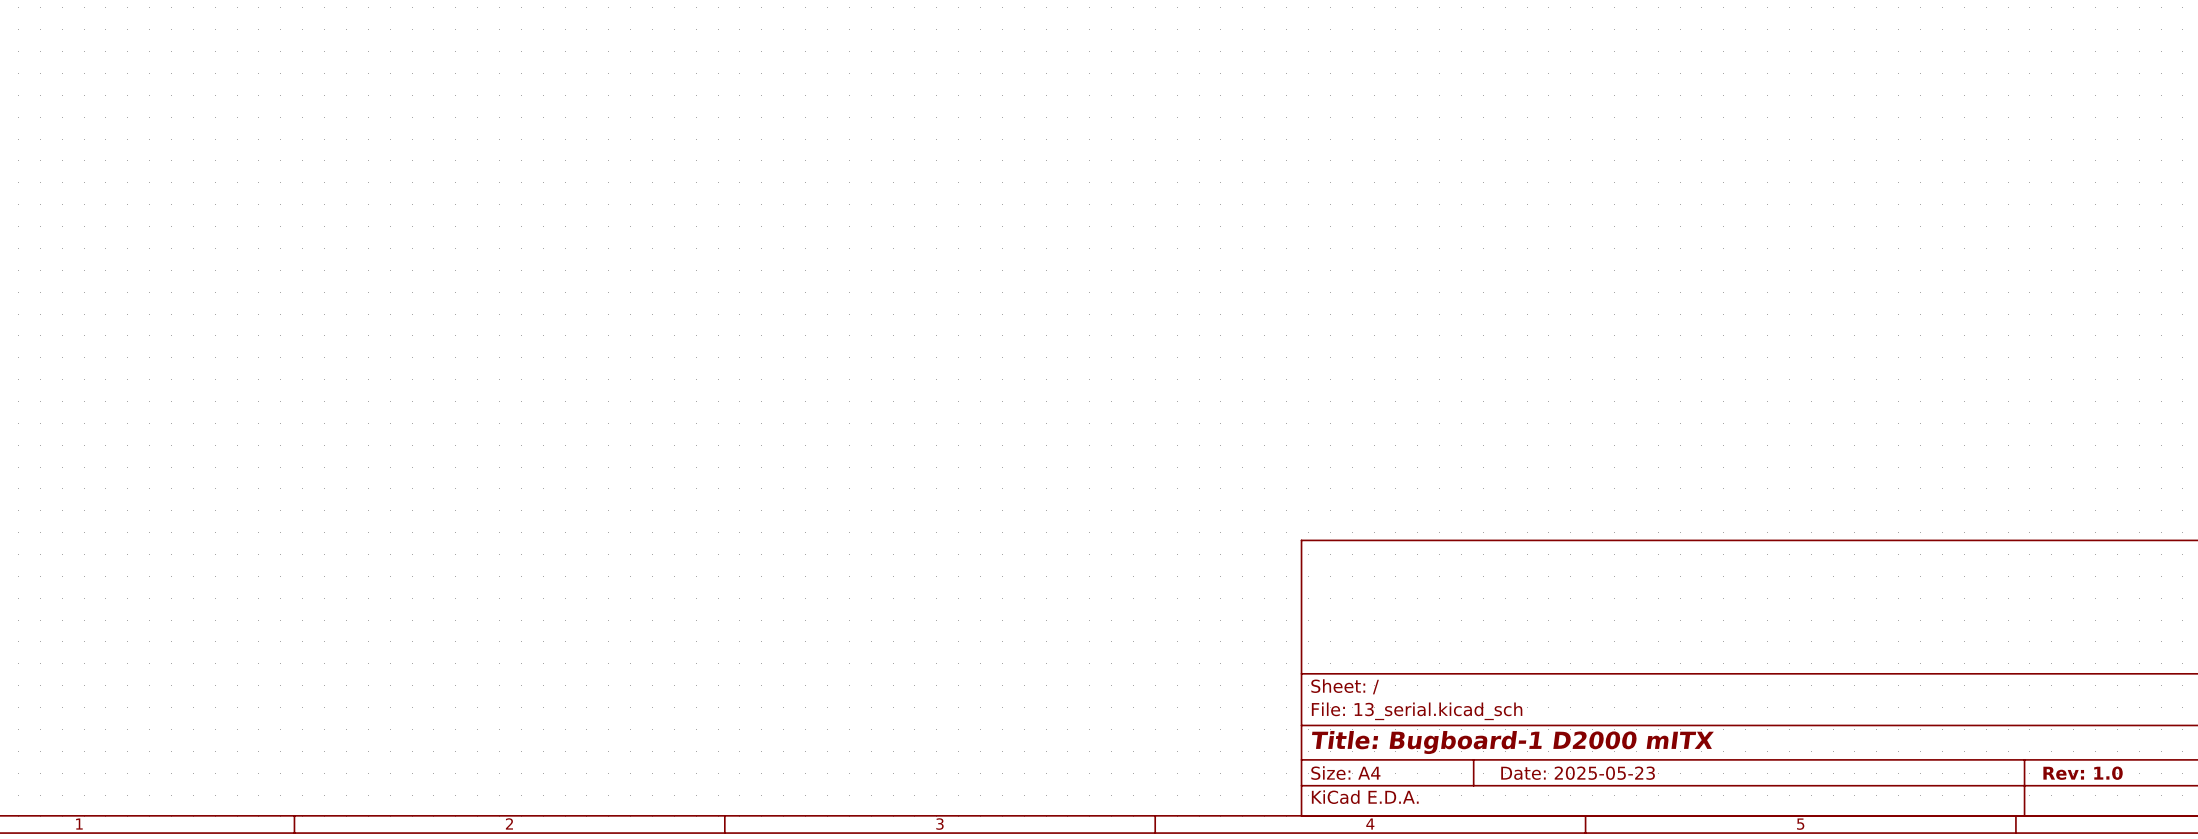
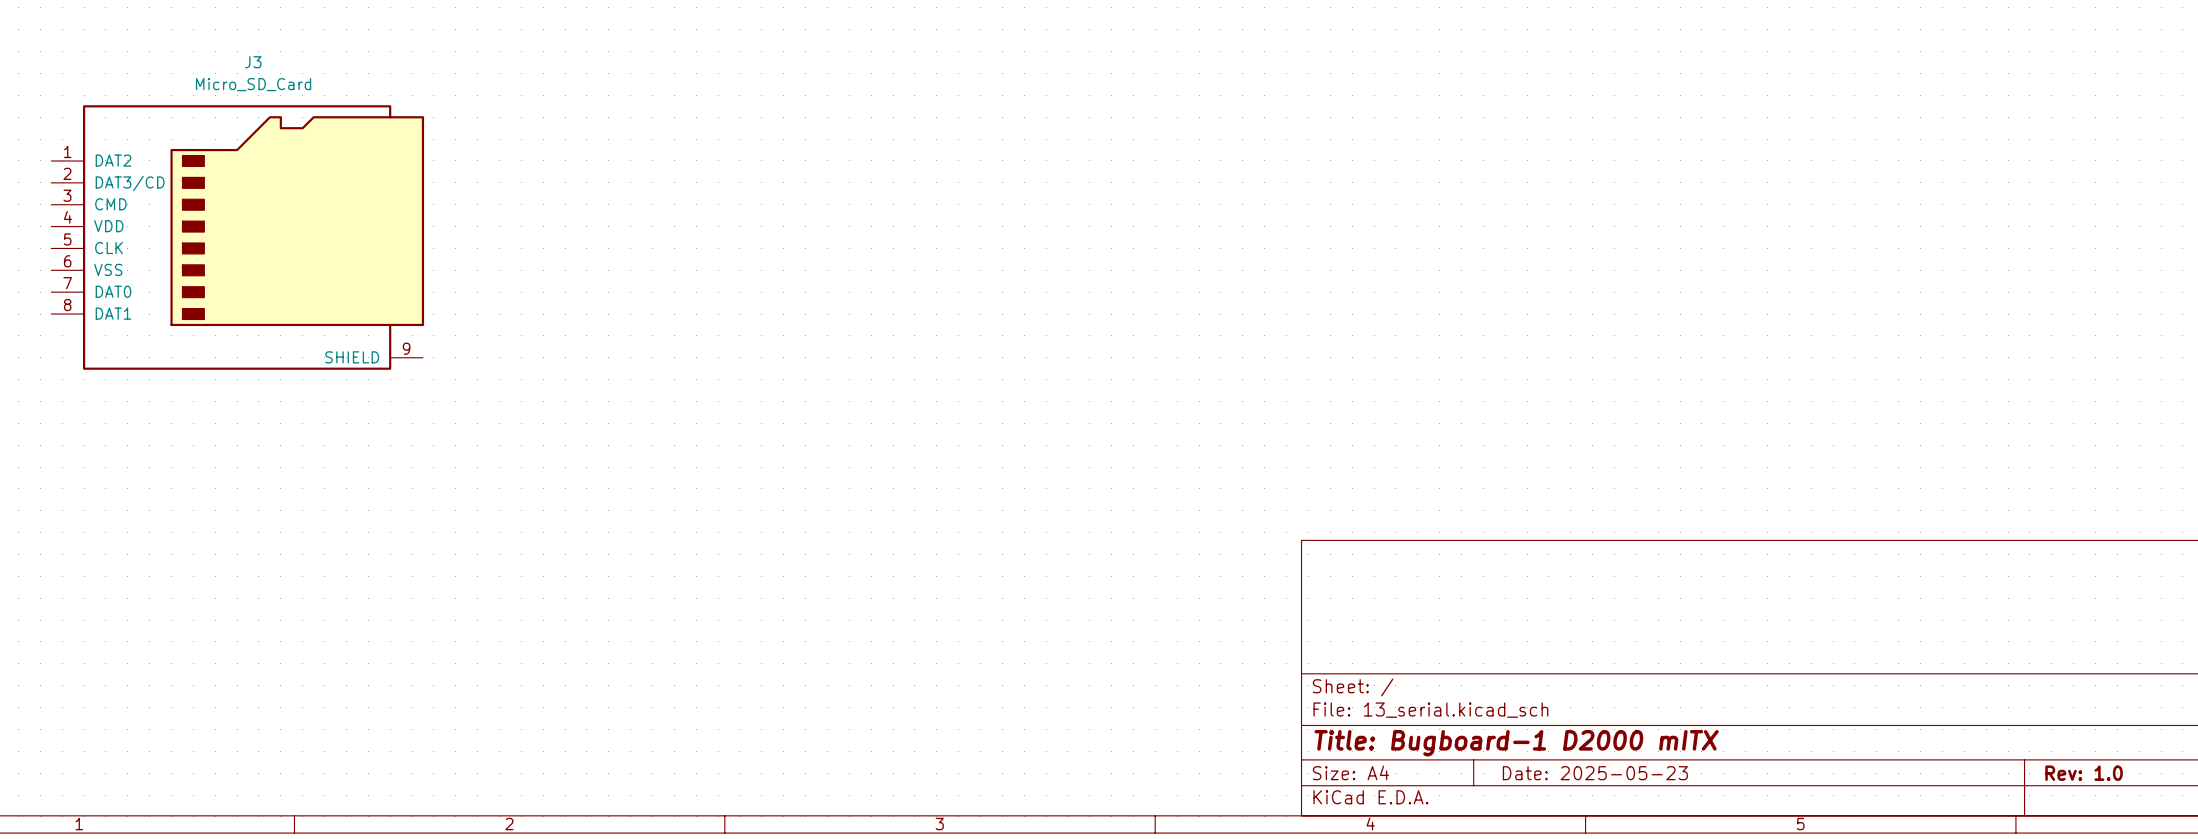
J3: none -> Micro_SD_Card (237, 237)

